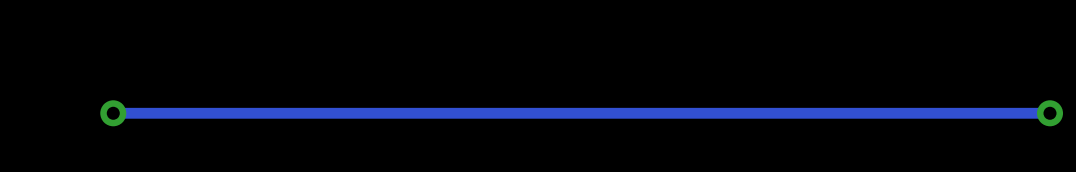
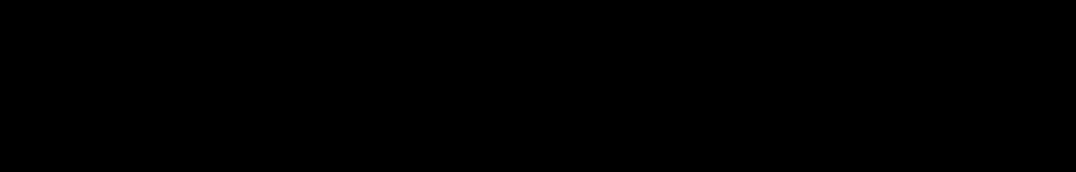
via: (113, 113) -> none
track: (1049, 113) (113, 113) -> none
via: (1049, 113) -> none

